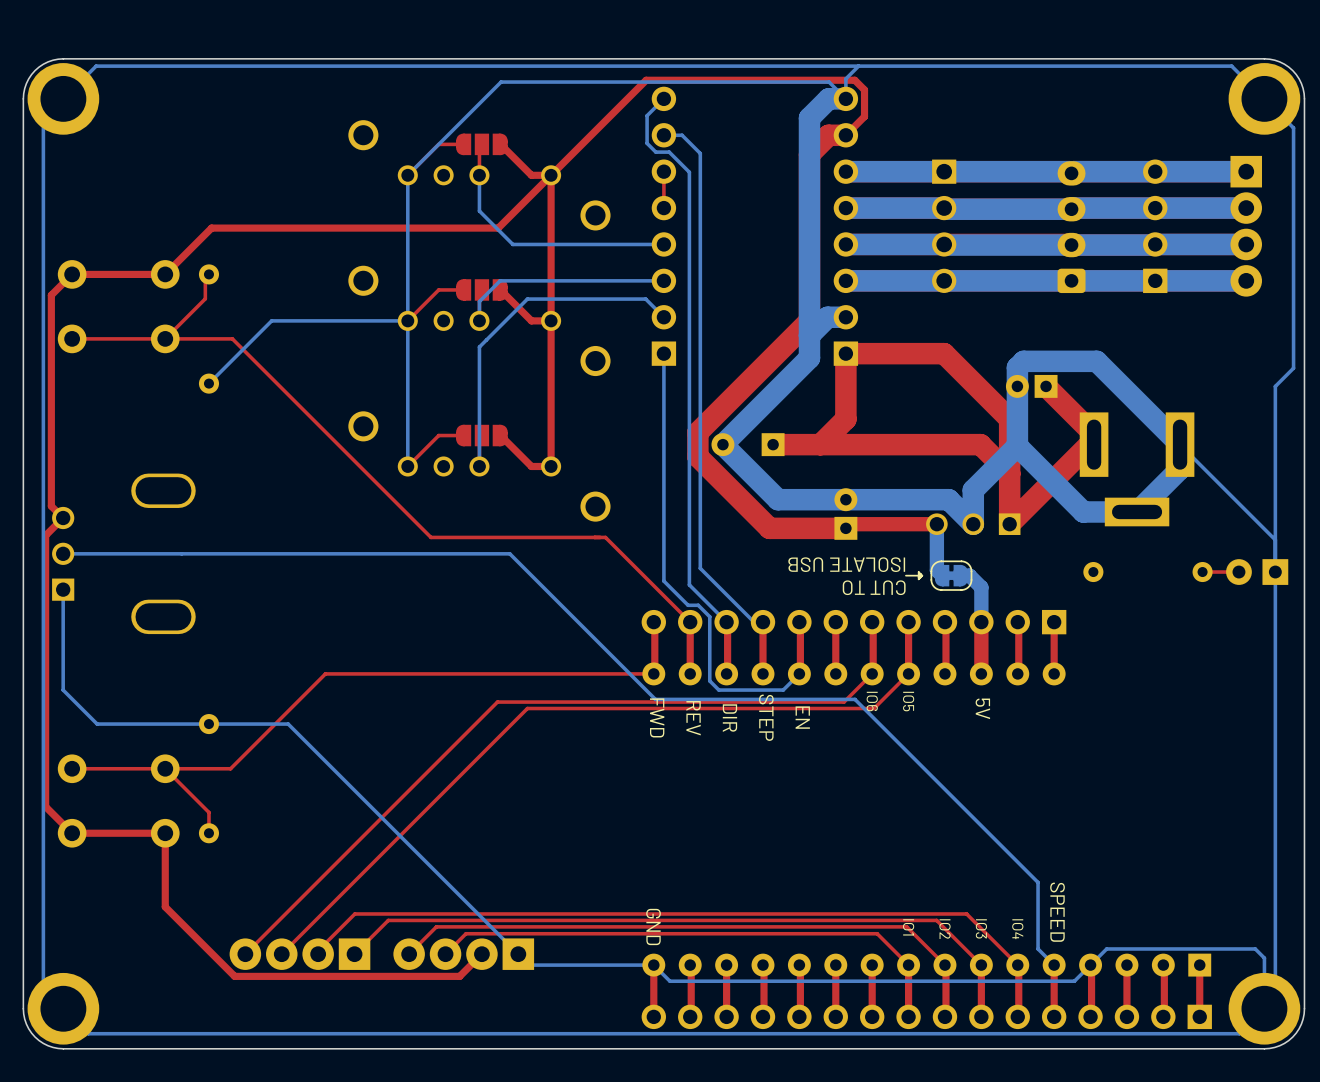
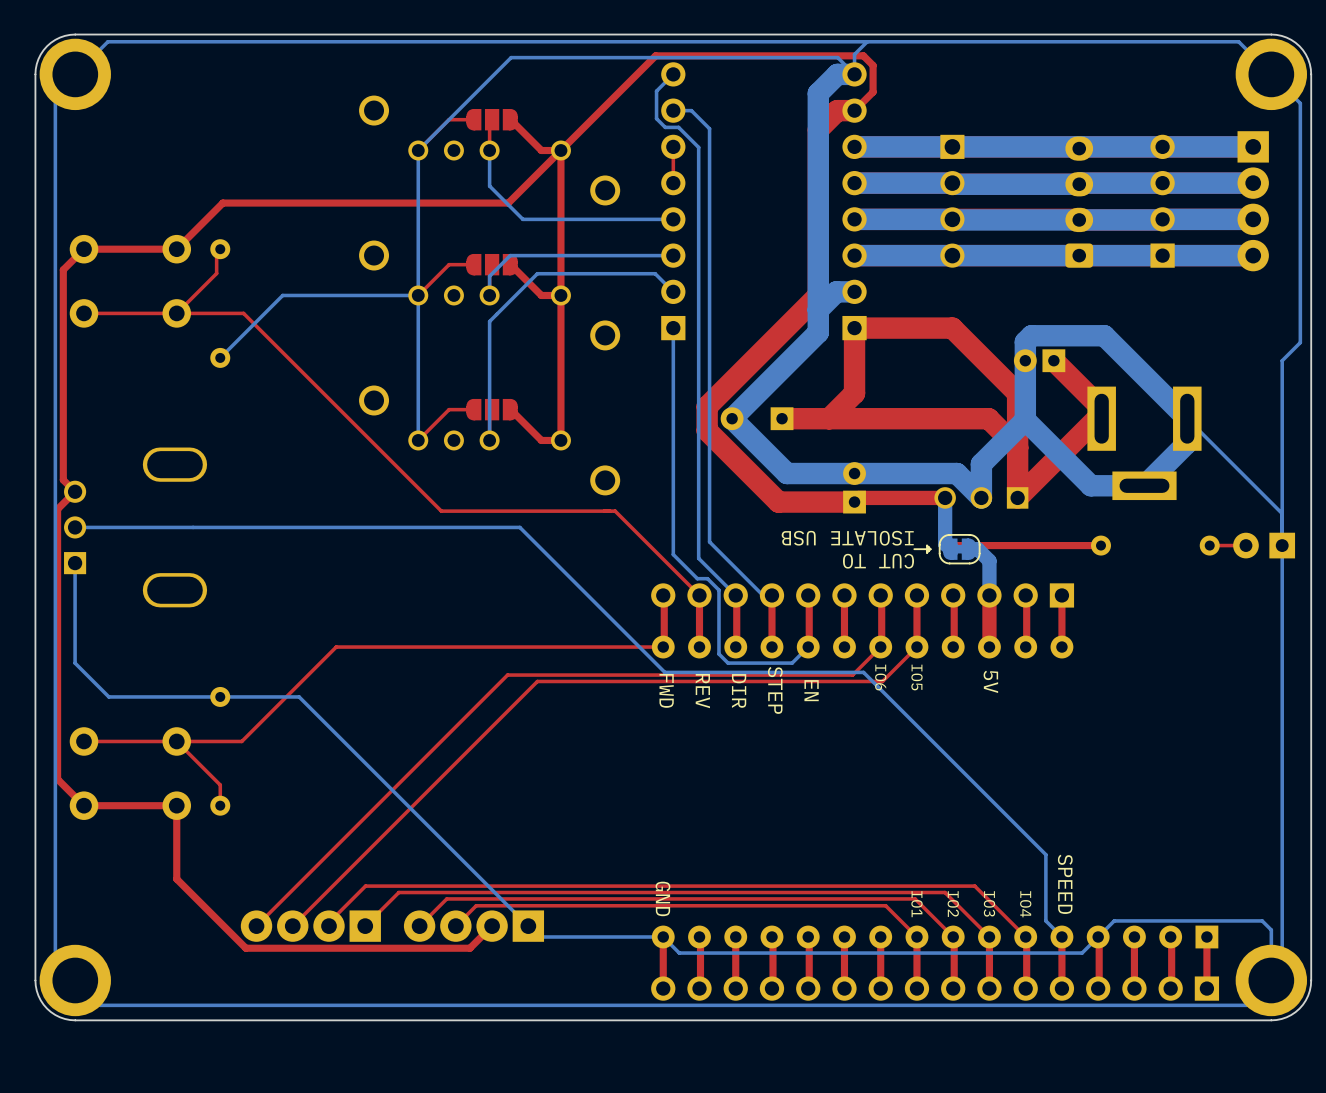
top track: none -> (945, 497) (945, 536) (954, 545) (1100, 545)

